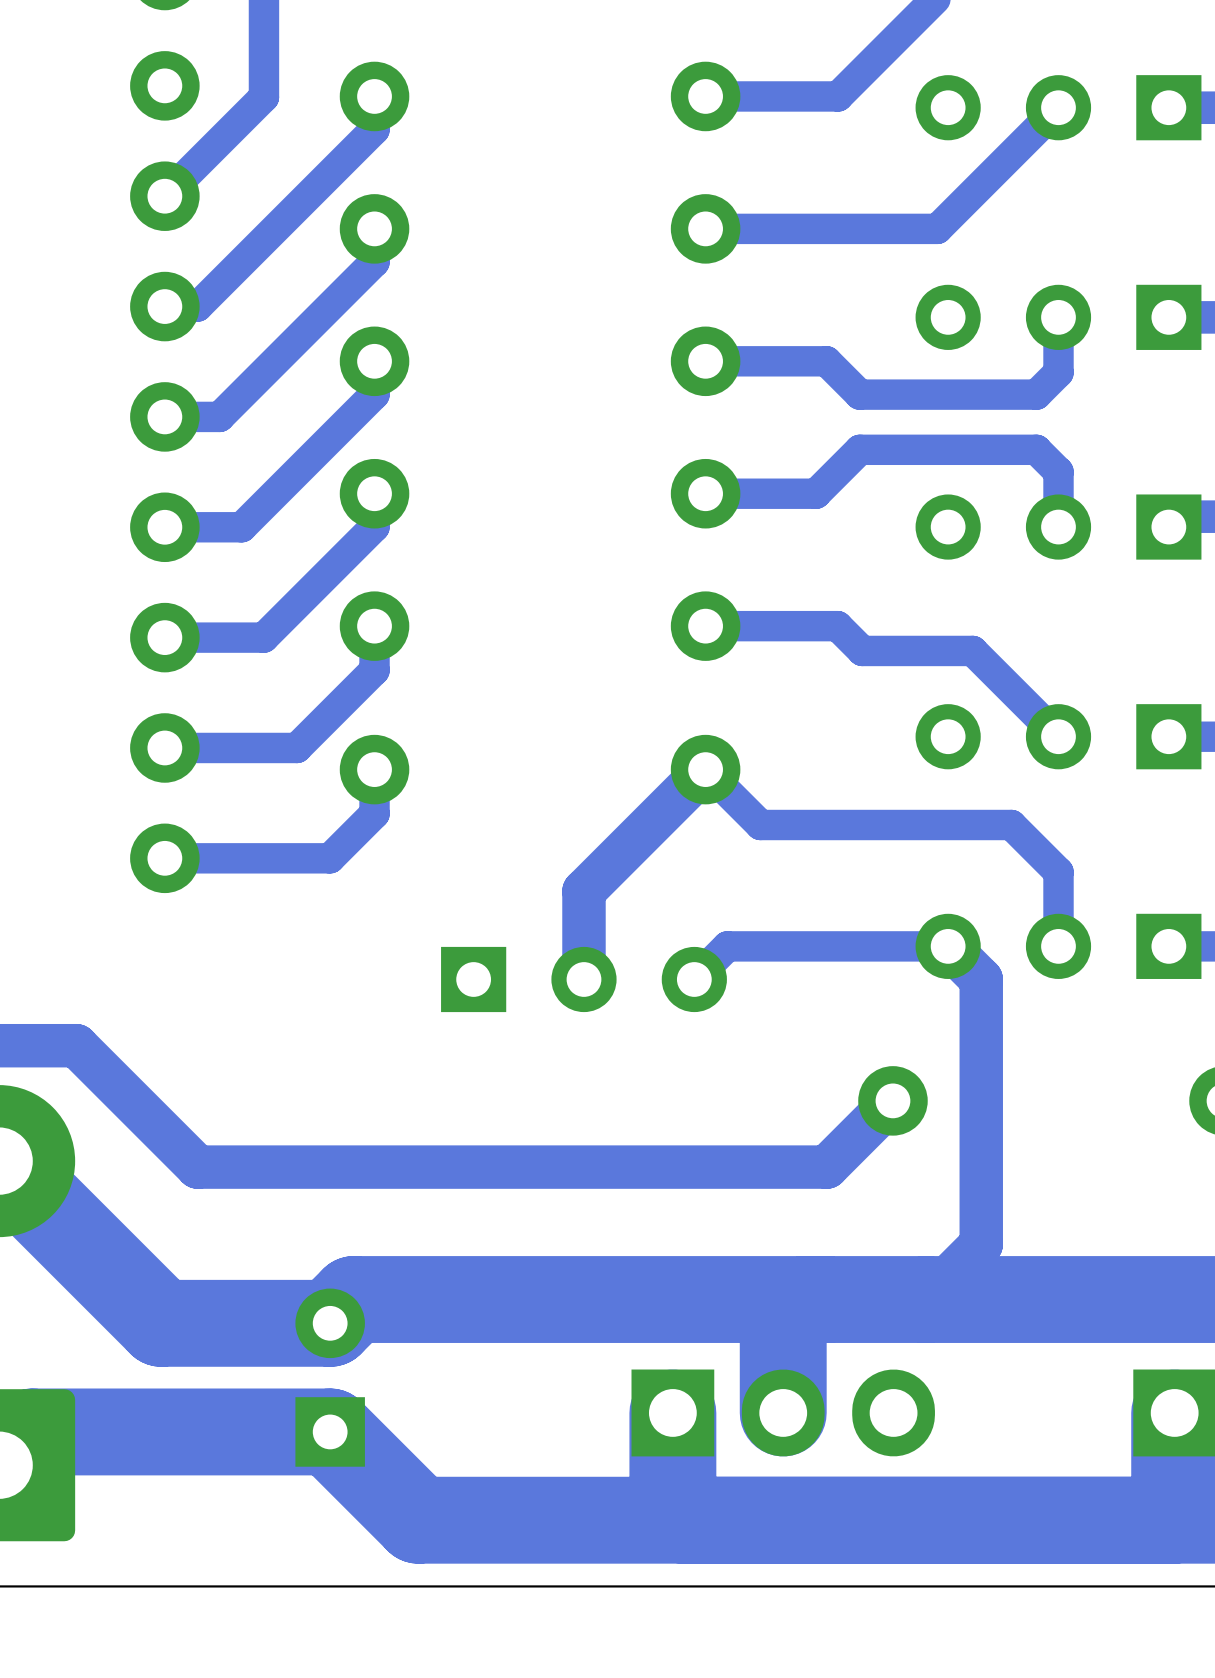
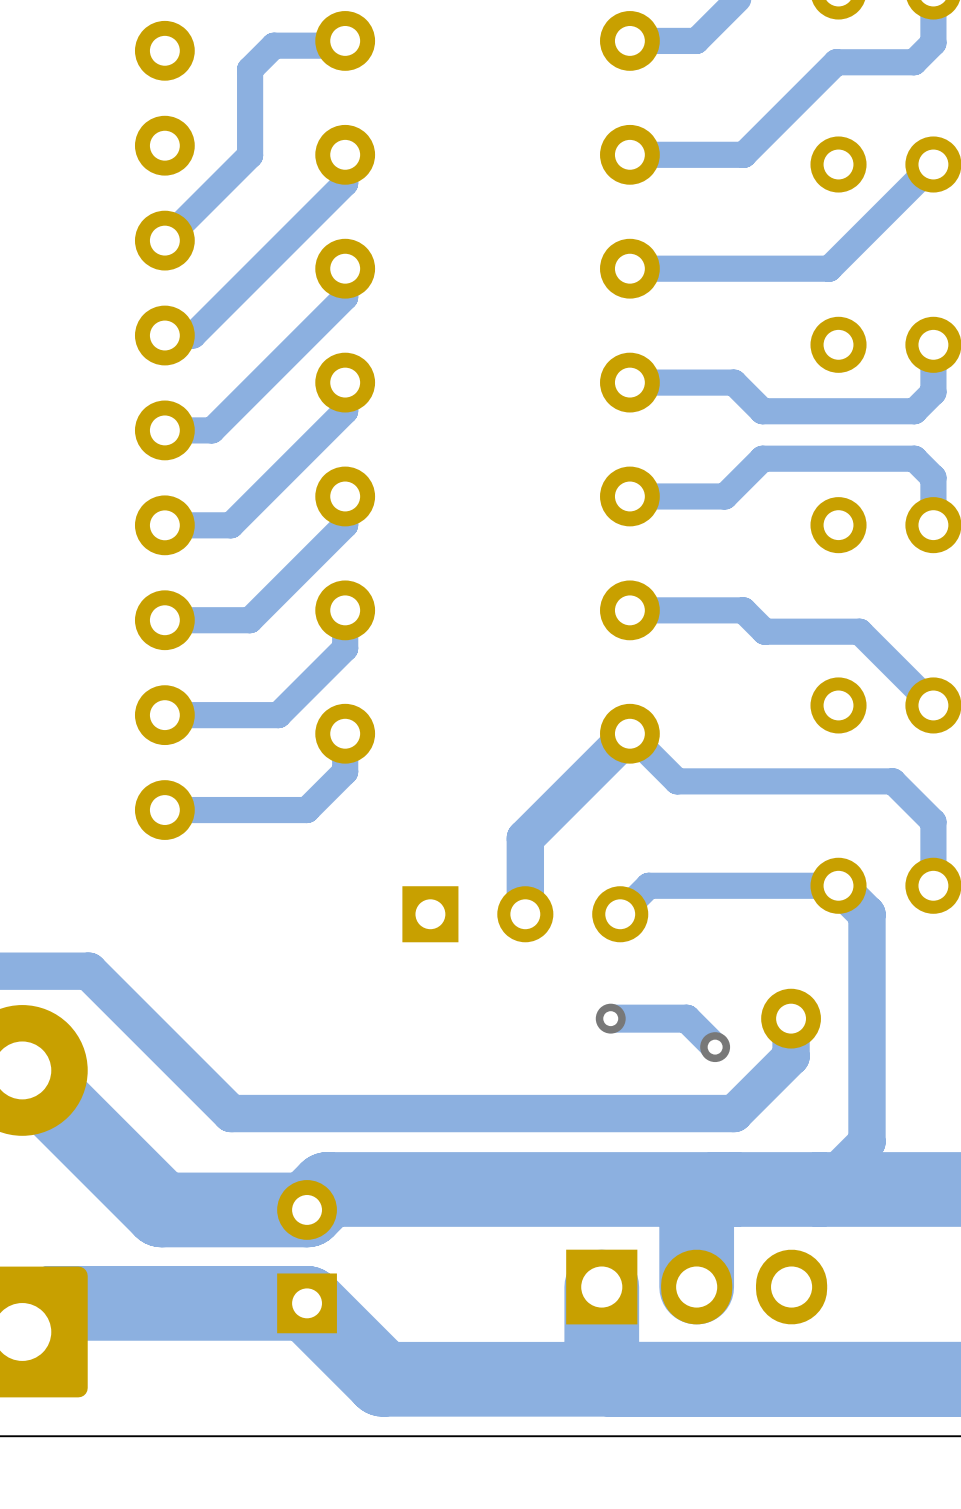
track: none -> (610, 1018) (686, 1018) (715, 1047)
via: none -> (610, 1018)
track: (892, 1100) (826, 1167) (197, 1167) -> (791, 1018) (791, 1056) (734, 1113) (231, 1113) (193, 1075)
via: none -> (715, 1047)

